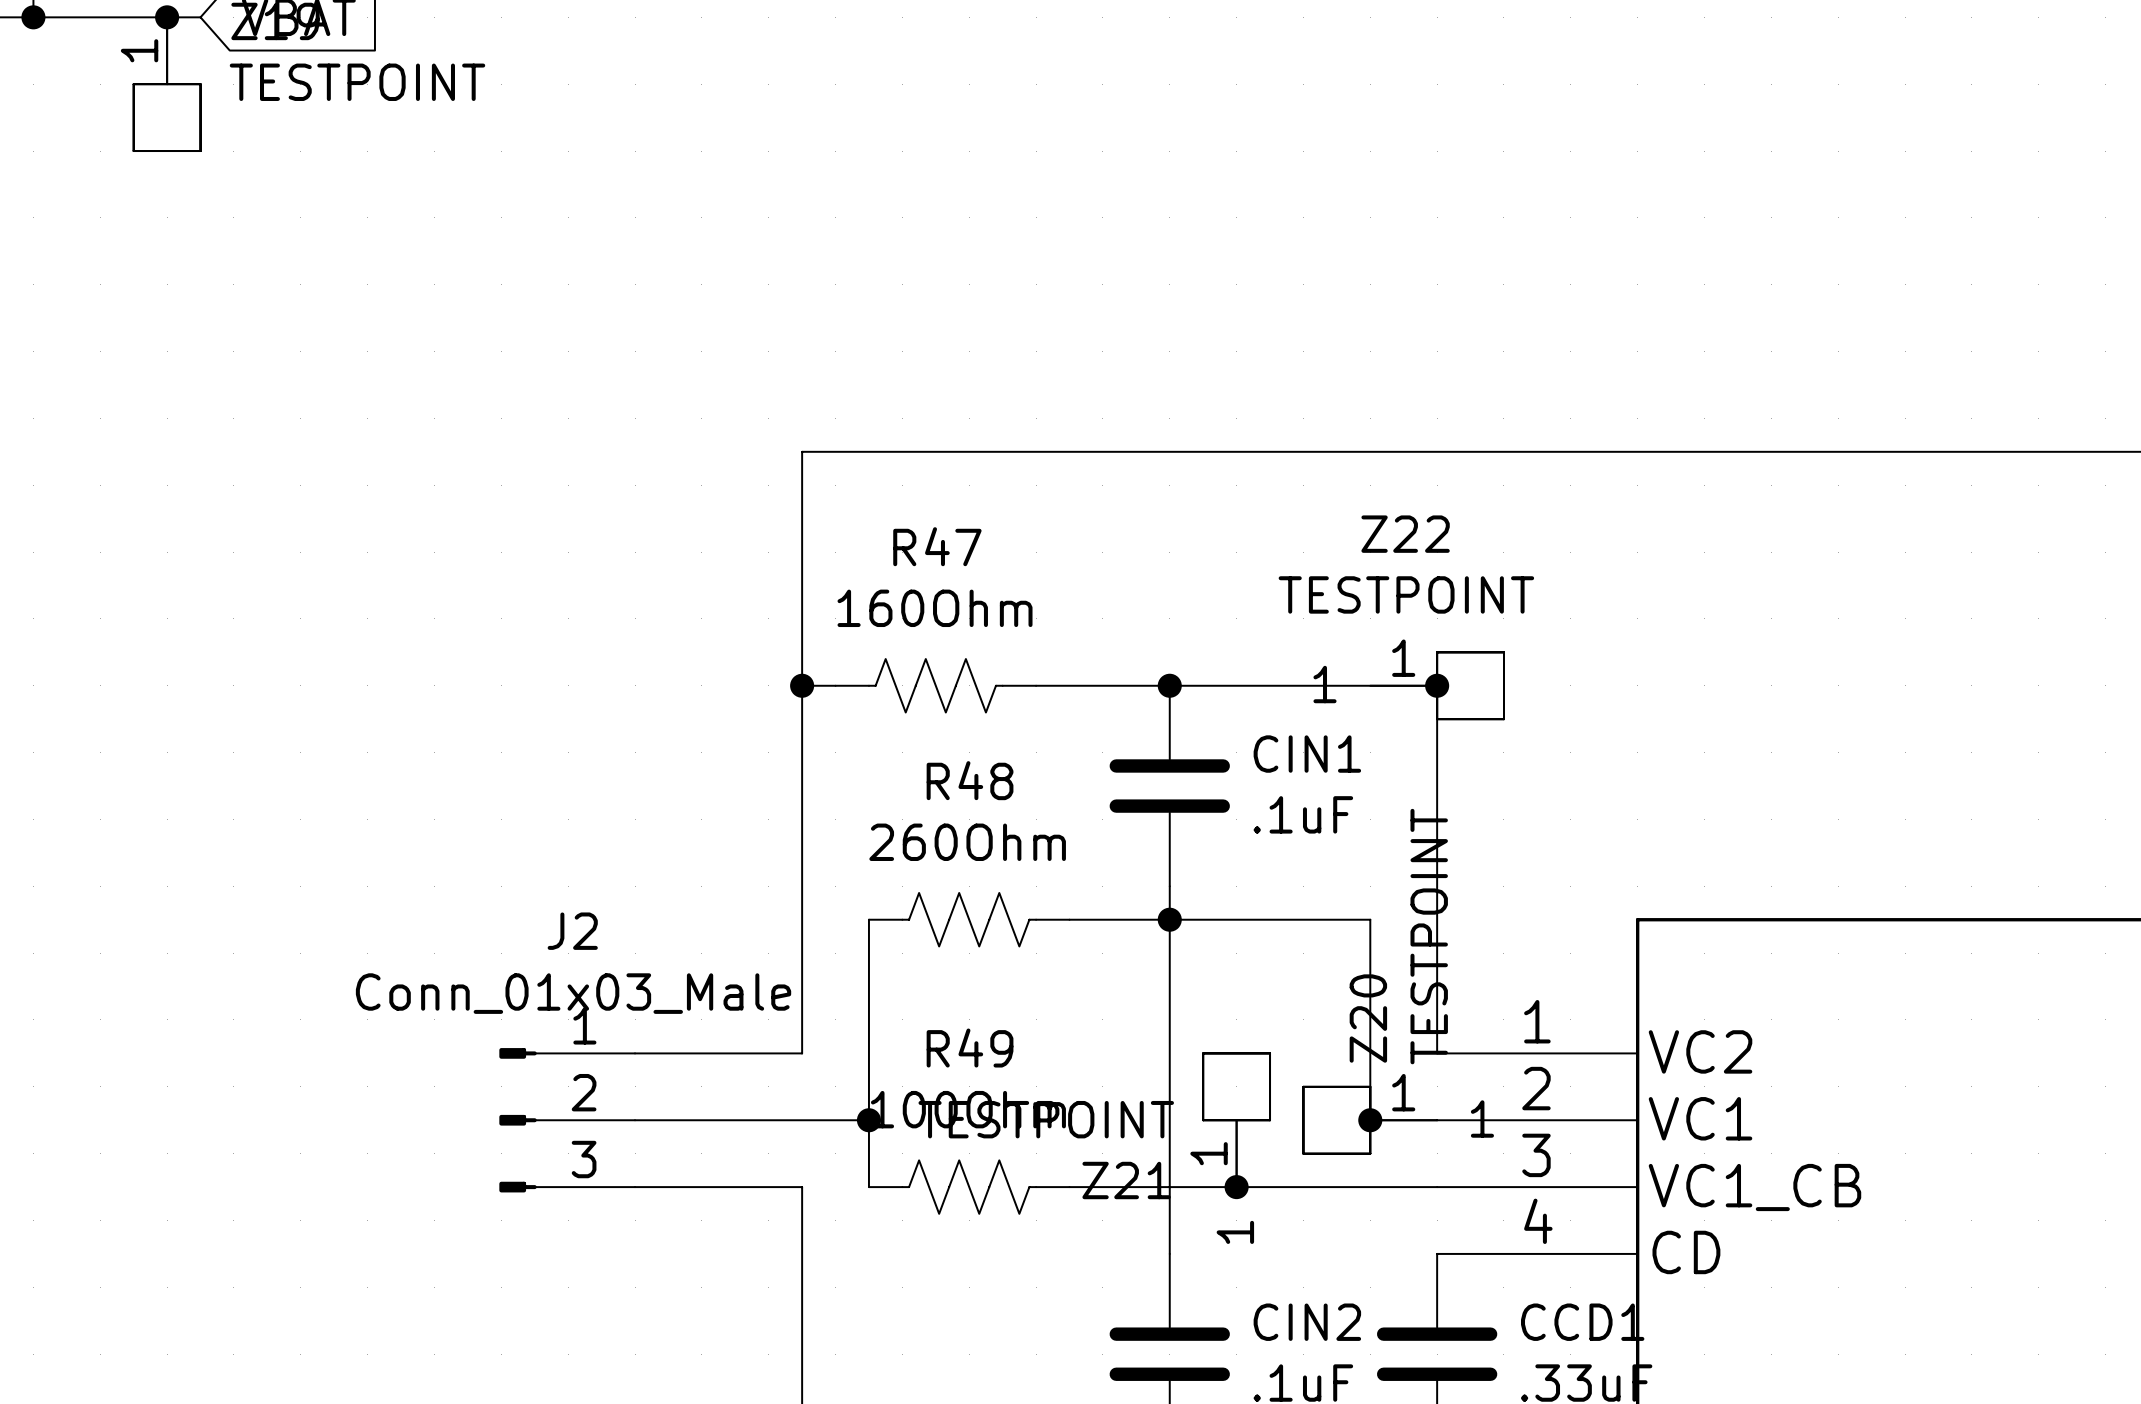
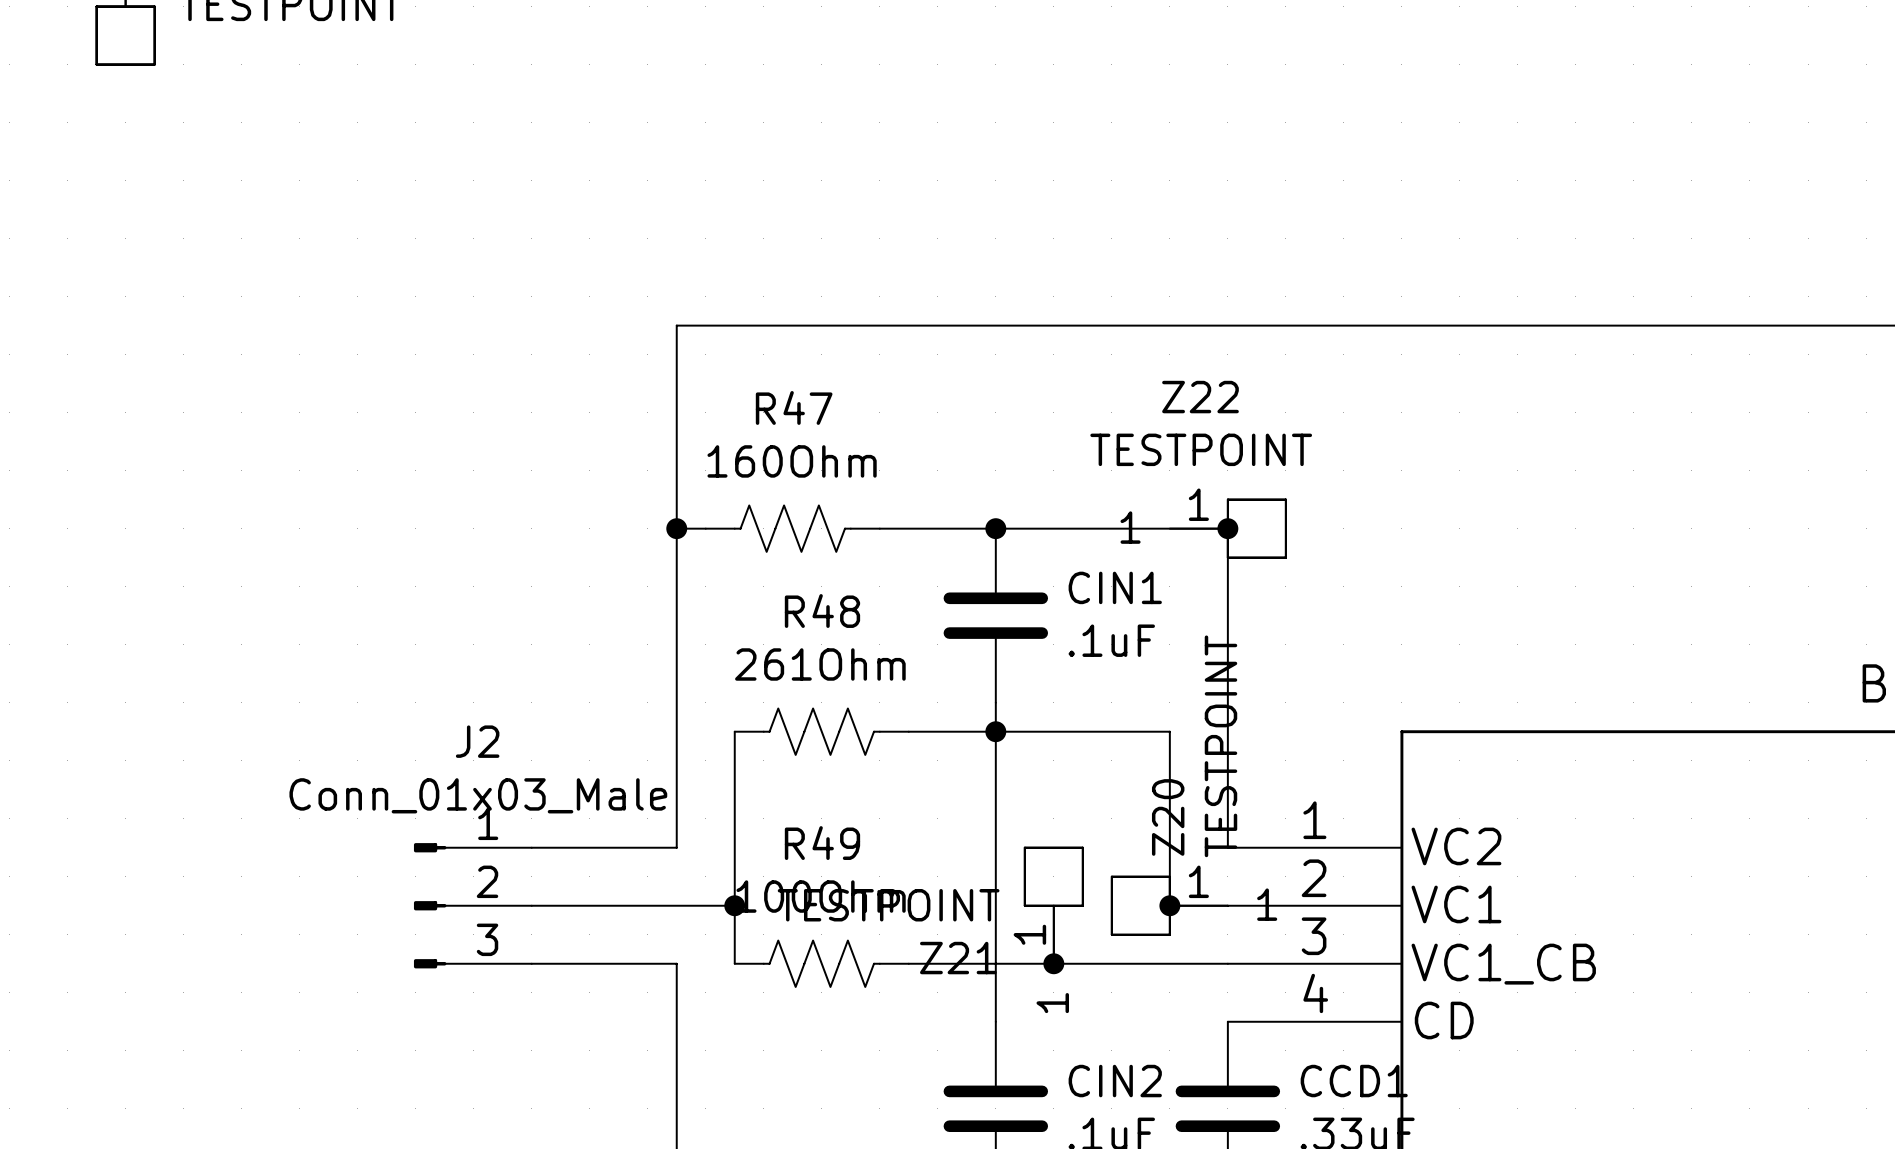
R48 value: 260Ohm (967, 842) -> 261Ohm (820, 664)

